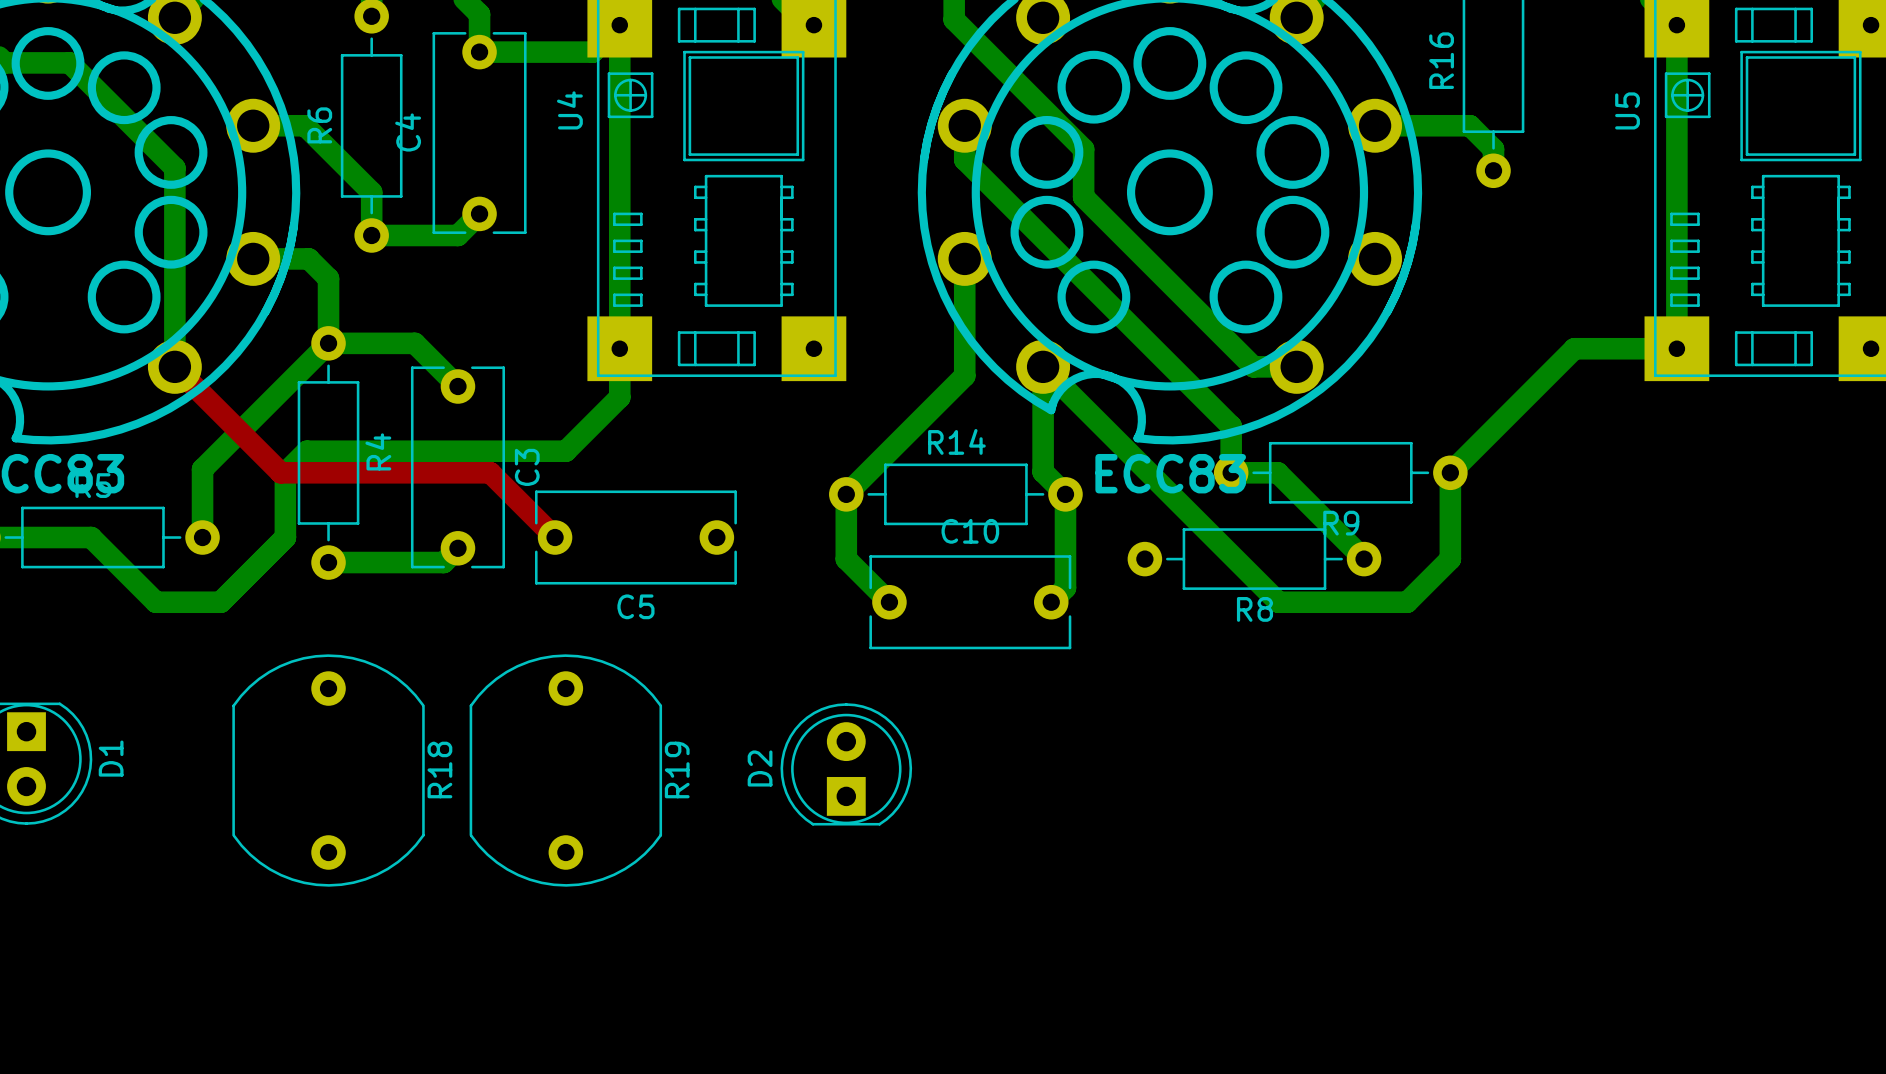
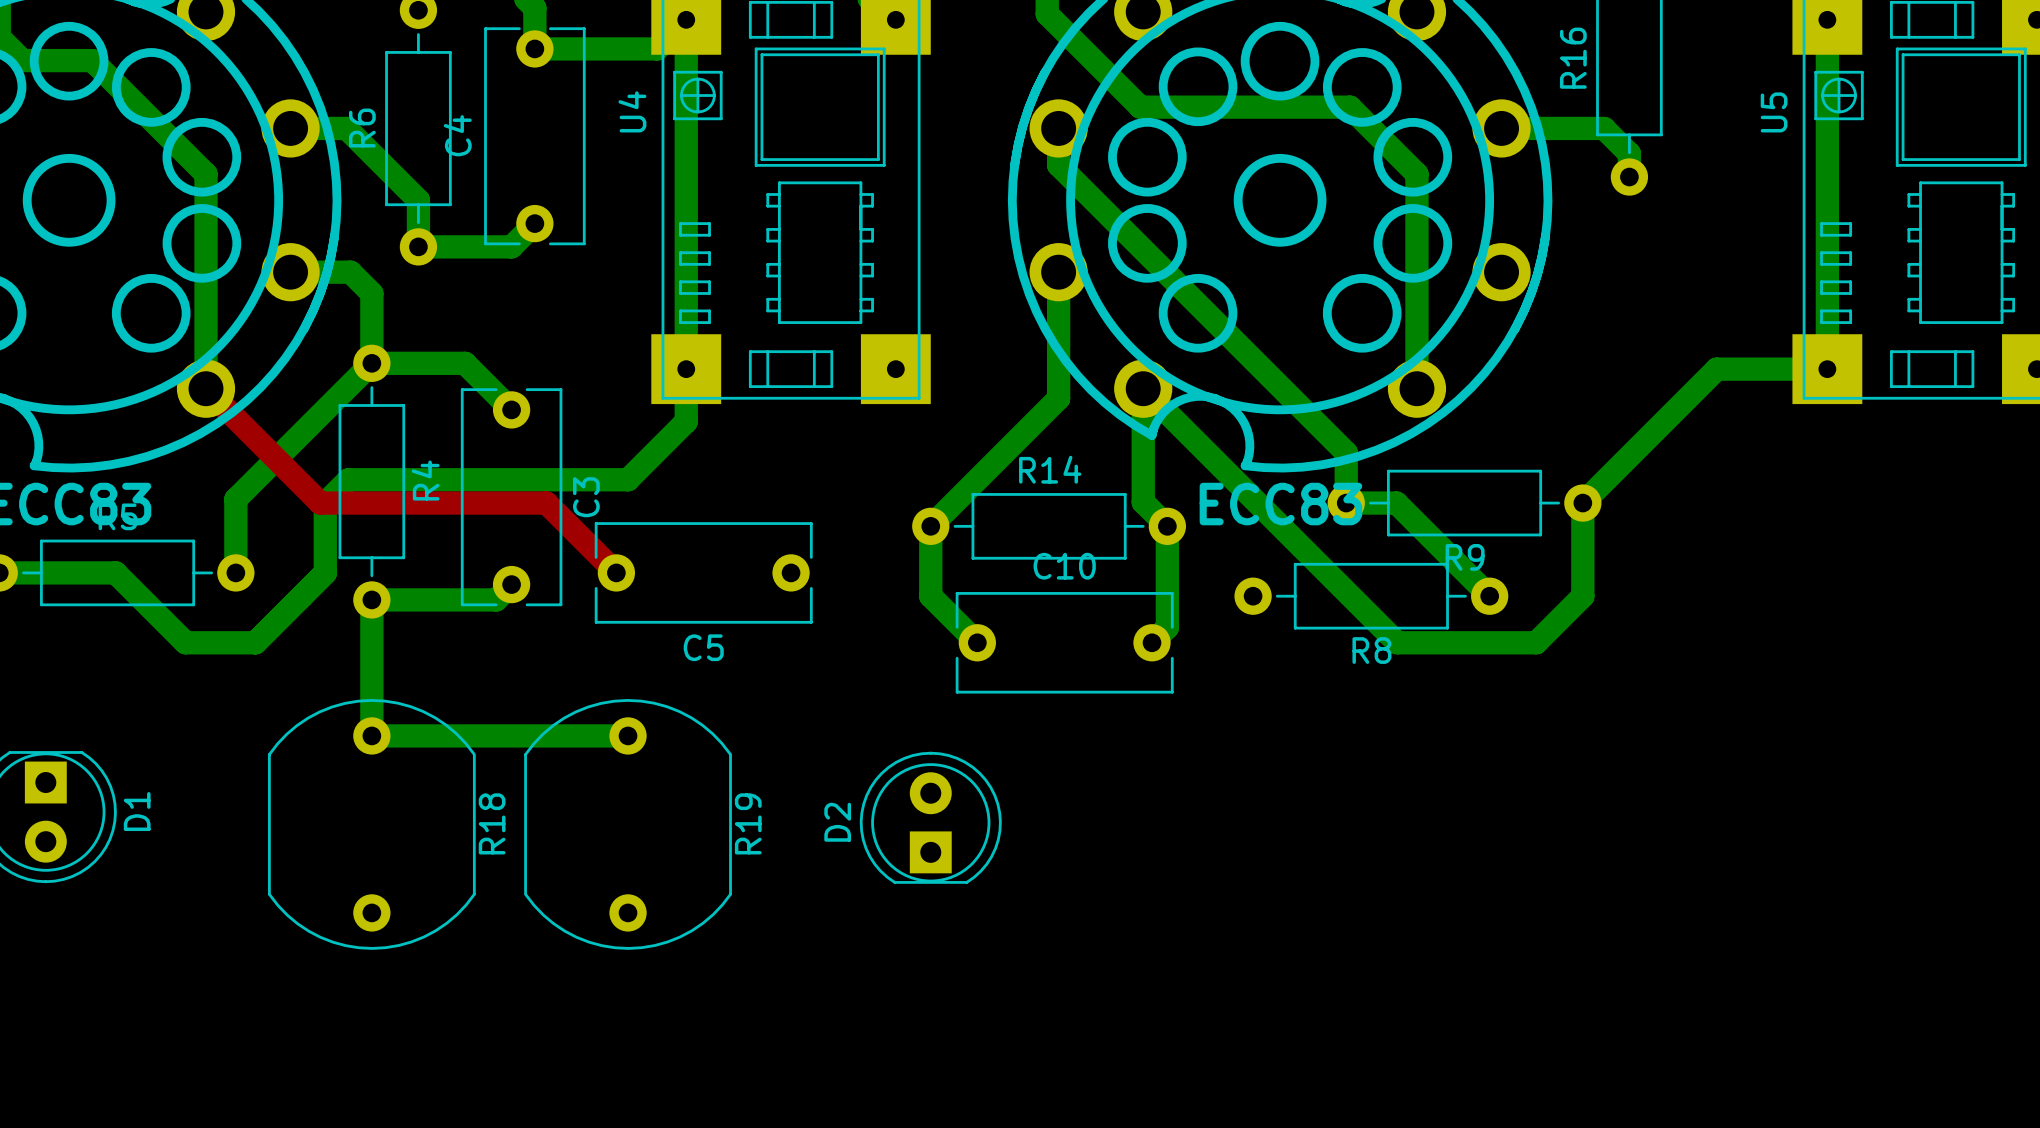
bottom track: (1040, 106) (1083, 149) (1083, 197) (1253, 366) (1296, 366) -> (1140, 107) (1349, 107) (1416, 174) (1416, 388)
bottom track: none -> (371, 599) (371, 735) (628, 735)

